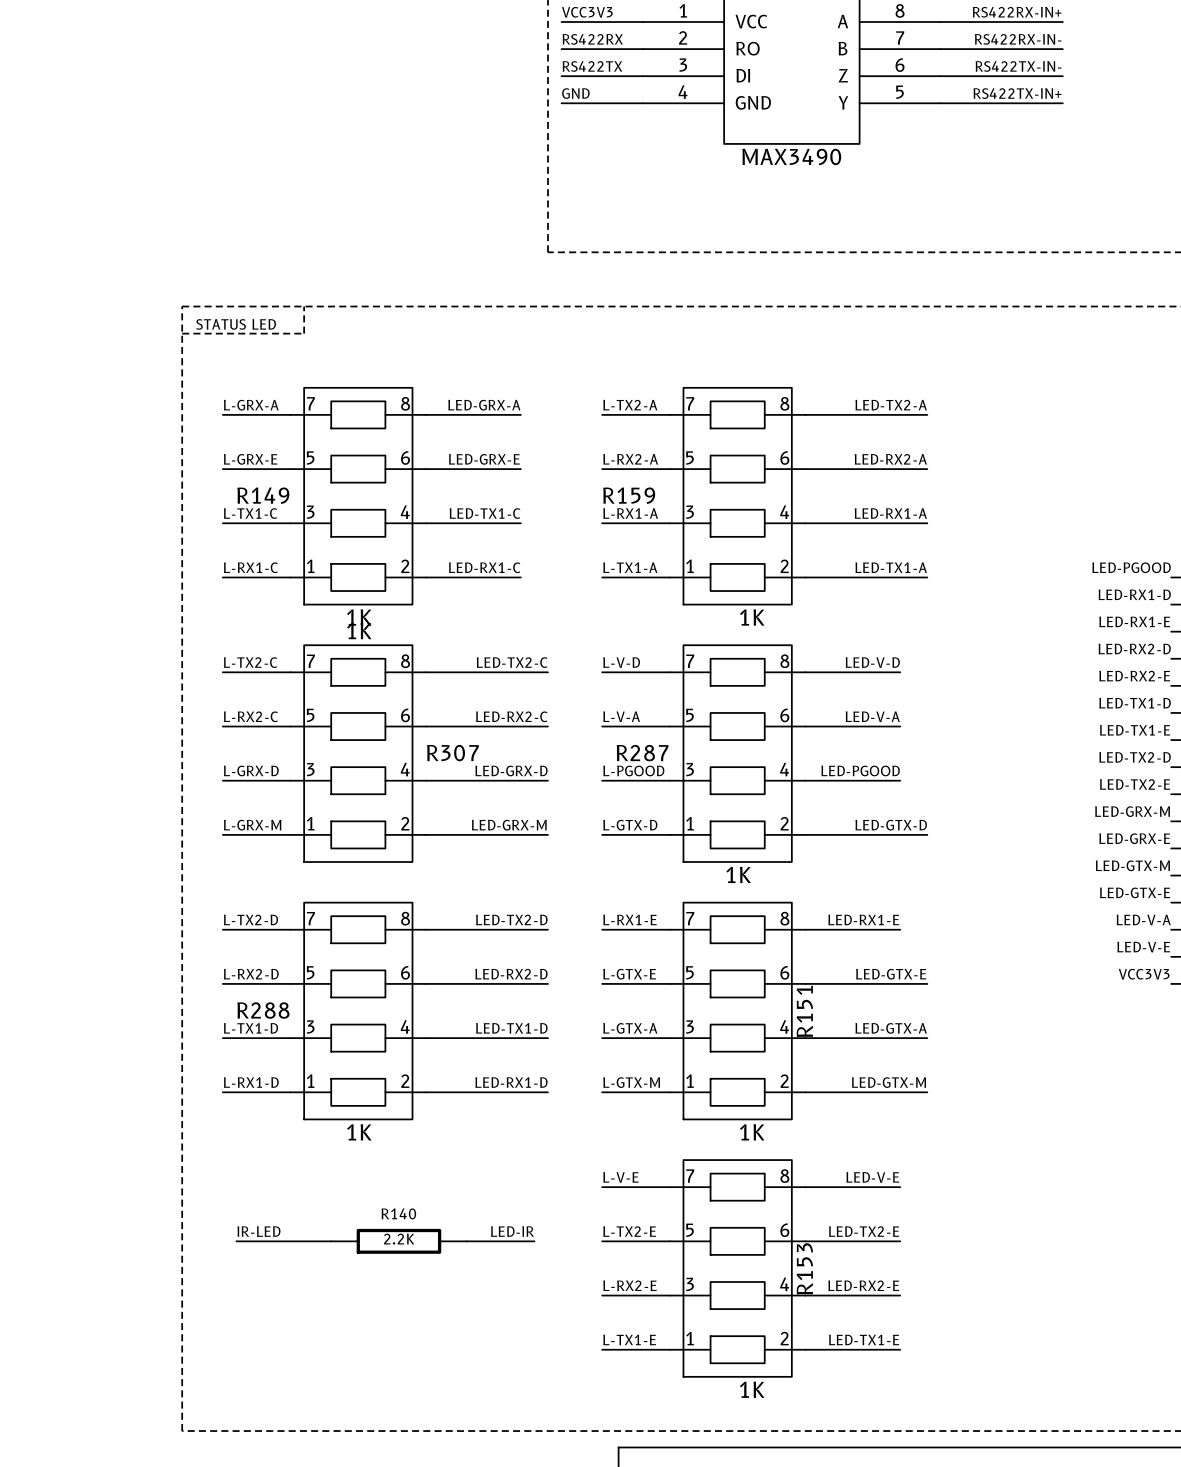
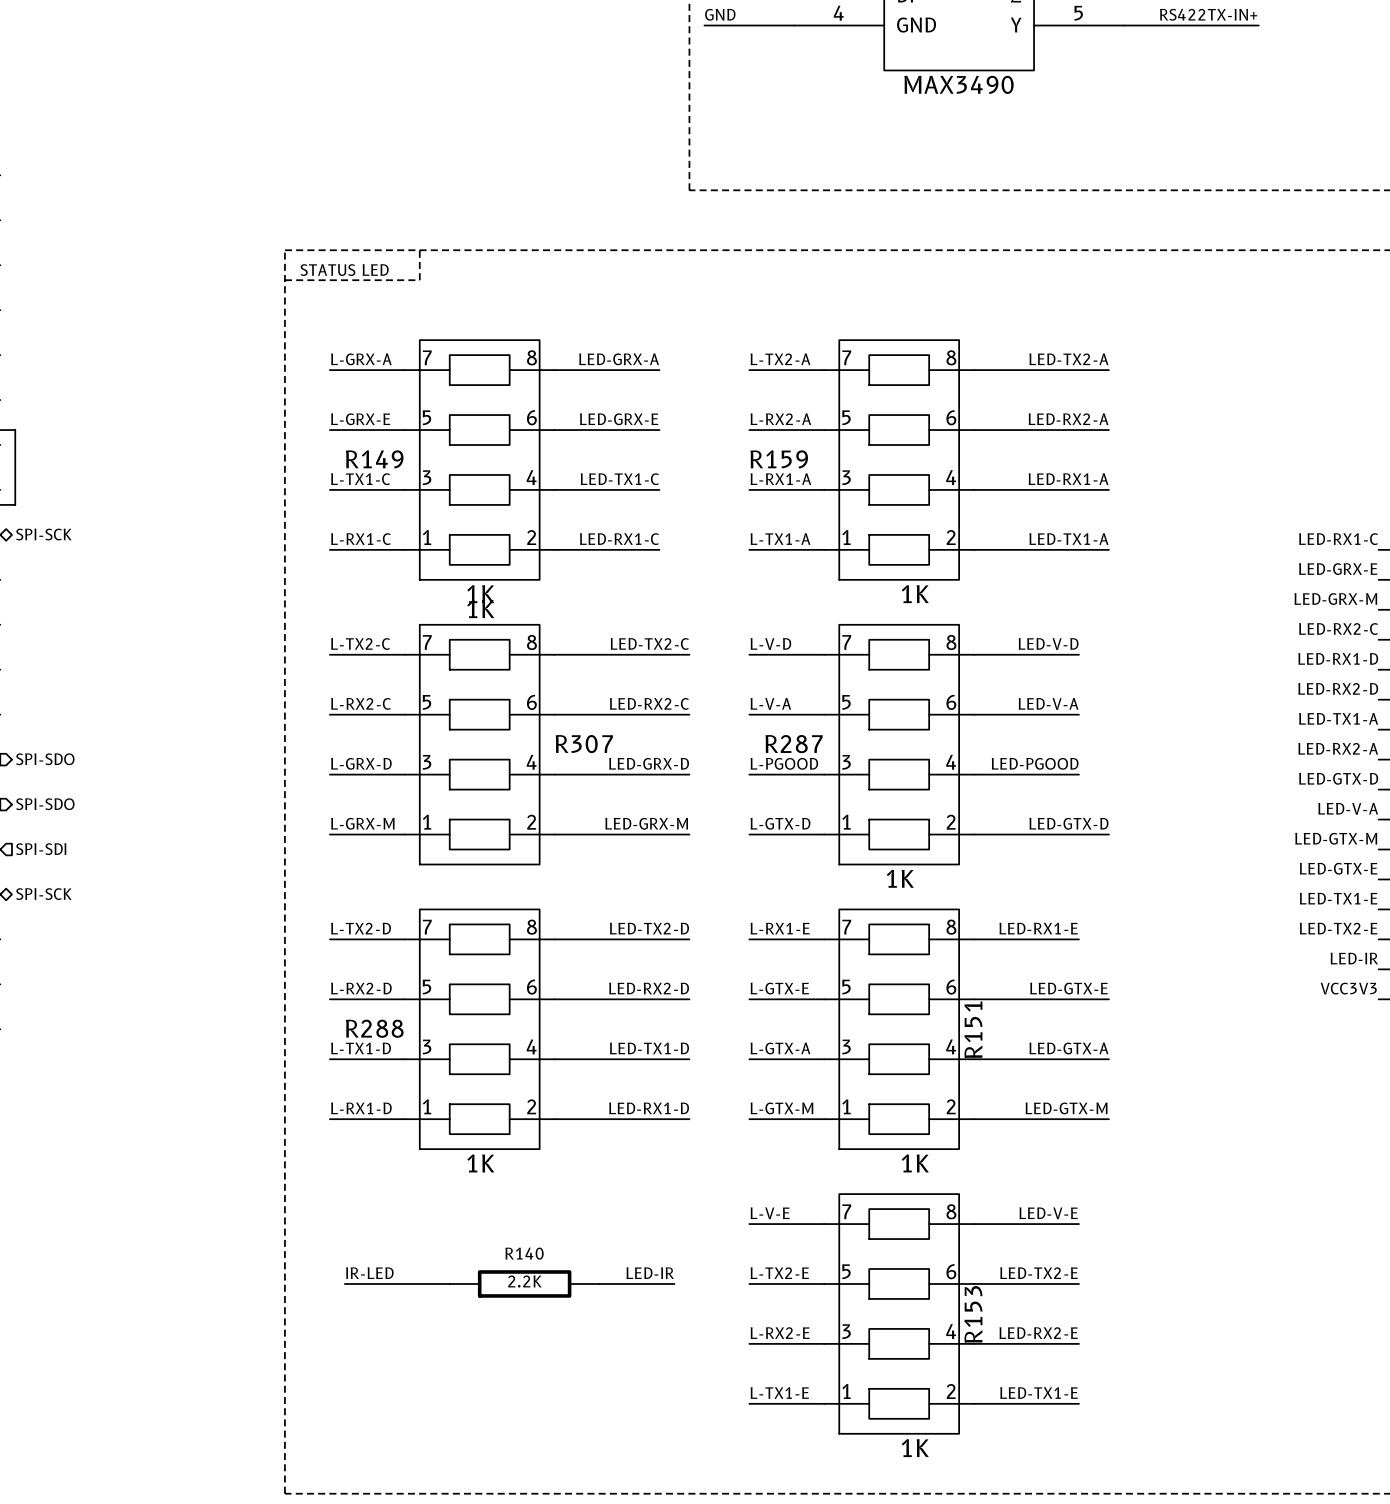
label: LED-PGOOD (1131, 567) -> LED-RX1-C (1338, 539)
label: LED-RX1-D (1134, 594) -> LED-GRX-E (1338, 569)
label: LED-RX1-E (1134, 621) -> LED-GRX-M (1335, 599)
label: LED-RX2-D (1134, 648) -> LED-RX2-C (1338, 629)
label: LED-RX2-E (1134, 676) -> LED-RX1-D (1338, 658)
label: LED-TX1-D (1135, 703) -> LED-RX2-D (1338, 688)
label: LED-TX1-E (1135, 730) -> LED-TX1-A (1338, 718)
label: LED-TX2-D (1135, 757) -> LED-RX2-A (1338, 748)
label: LED-TX2-E (1135, 784) -> LED-GTX-D (1338, 778)
label: LED-GRX-M (1132, 811) -> LED-V-A (1348, 808)
label: LED-GRX-E (1134, 838) -> LED-GTX-M (1336, 838)
label: LED-GTX-M (1132, 865) -> LED-GTX-E (1338, 868)
label: LED-GTX-E (1135, 892) -> LED-TX1-E (1338, 898)
label: LED-V-A (1143, 920) -> LED-TX2-E (1338, 928)
label: LED-V-E (1143, 947) -> LED-IR (1354, 958)

